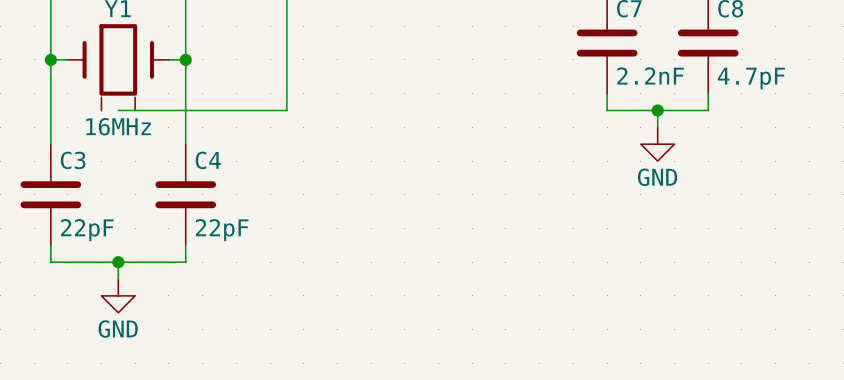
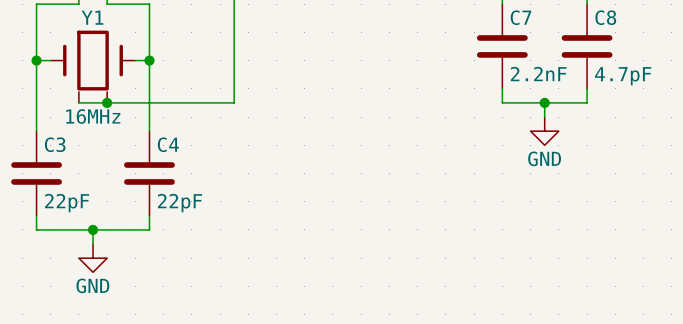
wire: none -> (78, 102) (93, 102)
junction: none -> (107, 102)

